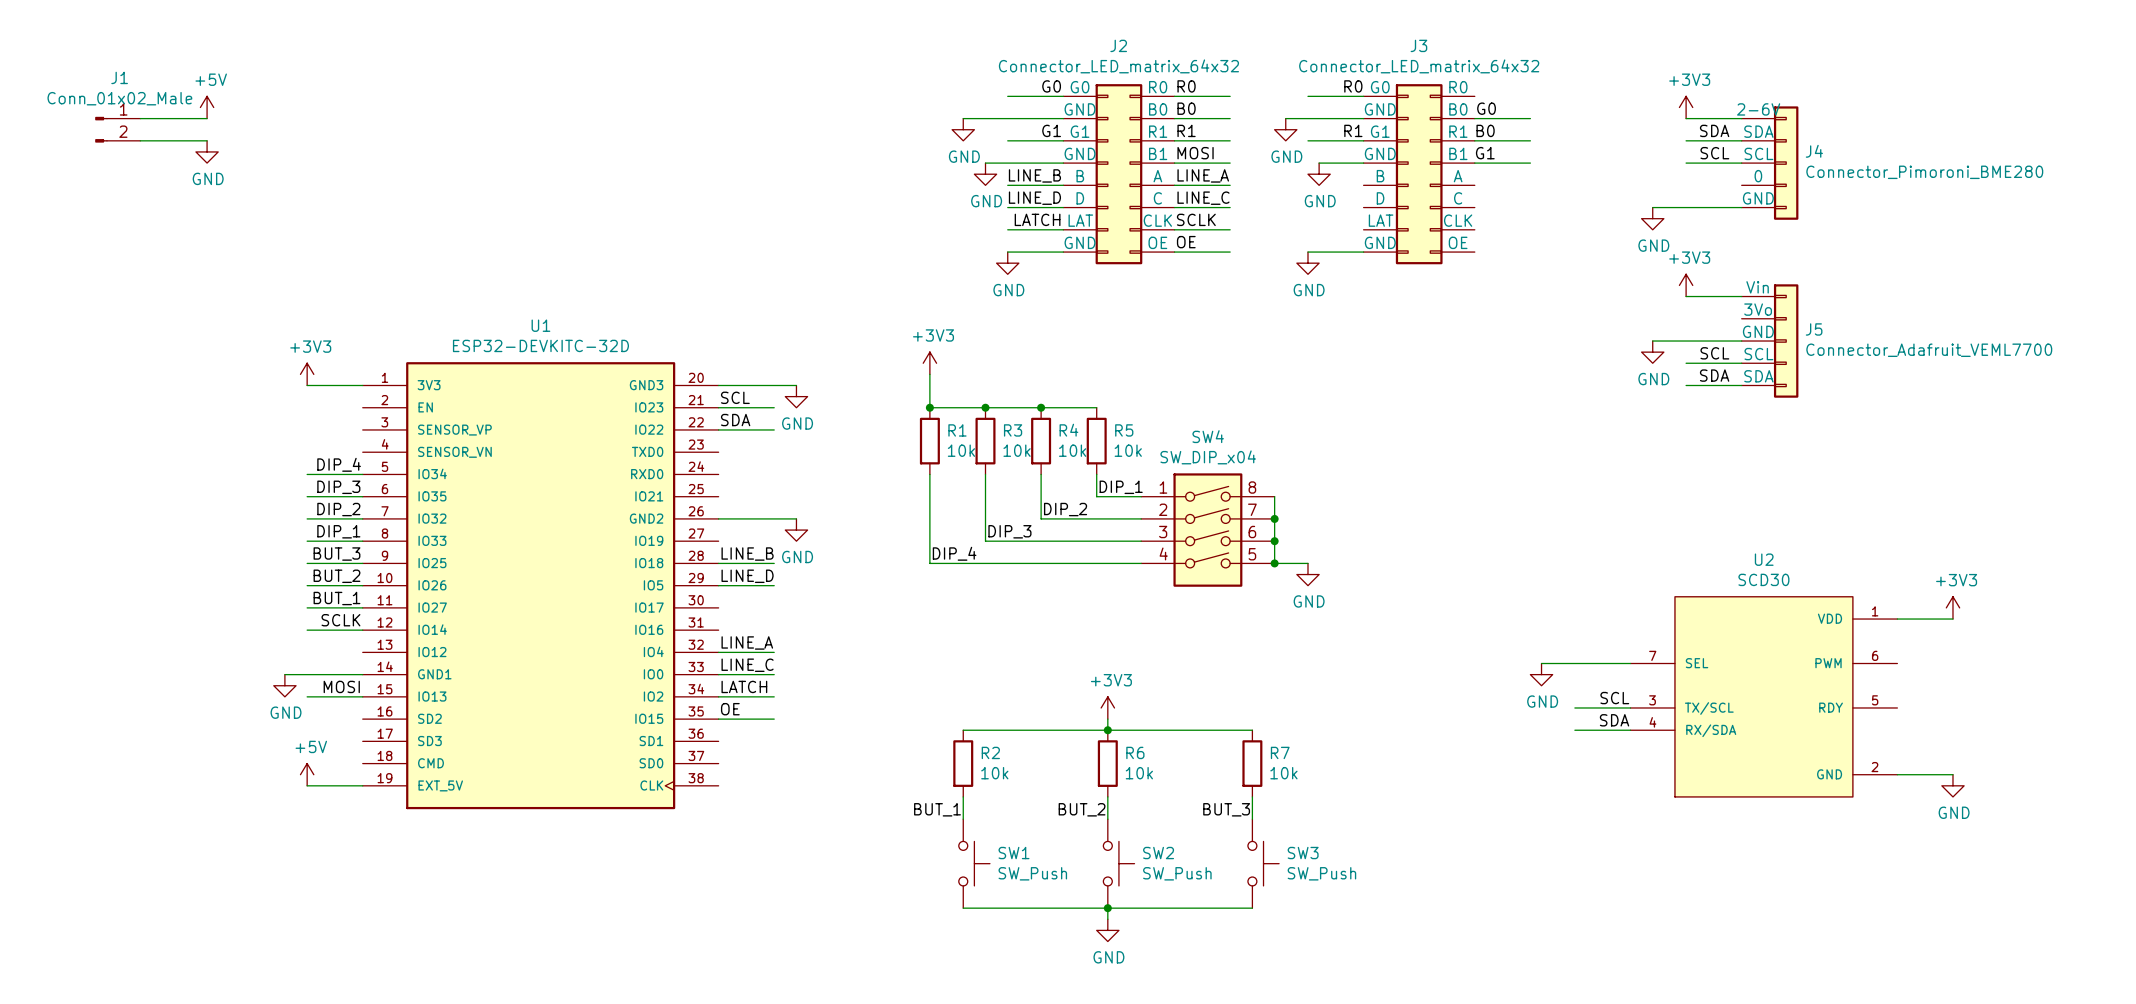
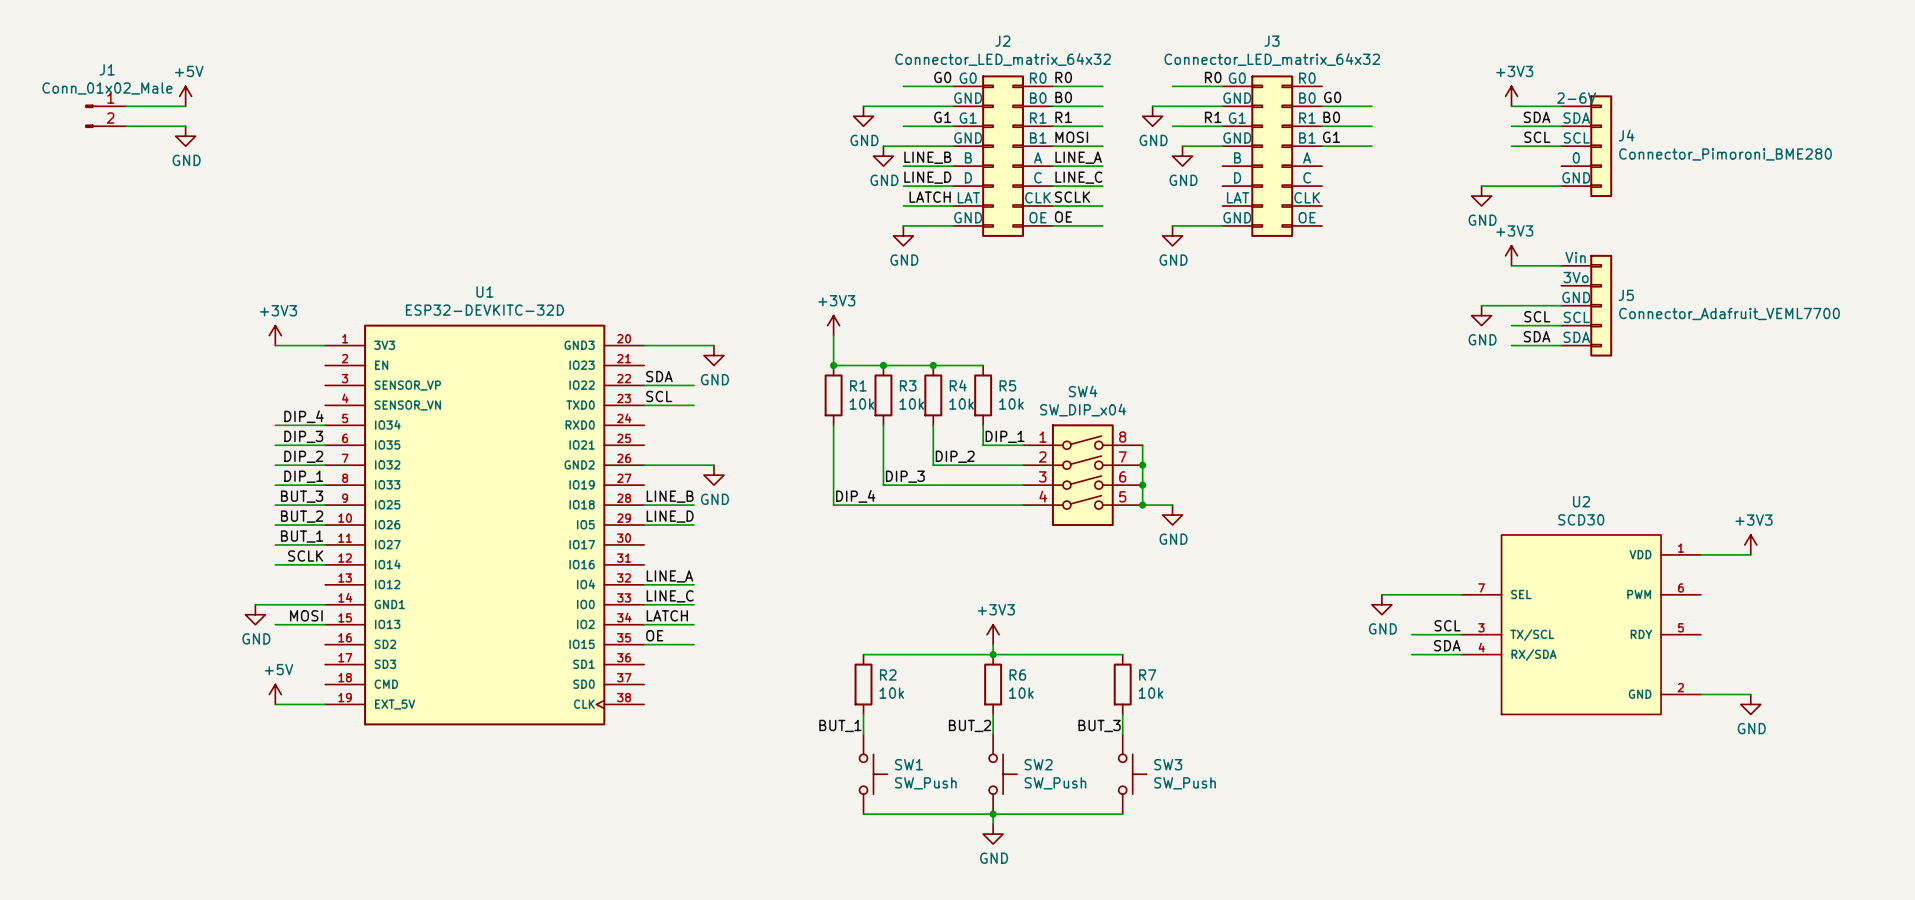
label position: SCL (735, 397) -> SCL (659, 396)
wire: (718, 407) (774, 407) -> (644, 405) (694, 405)

